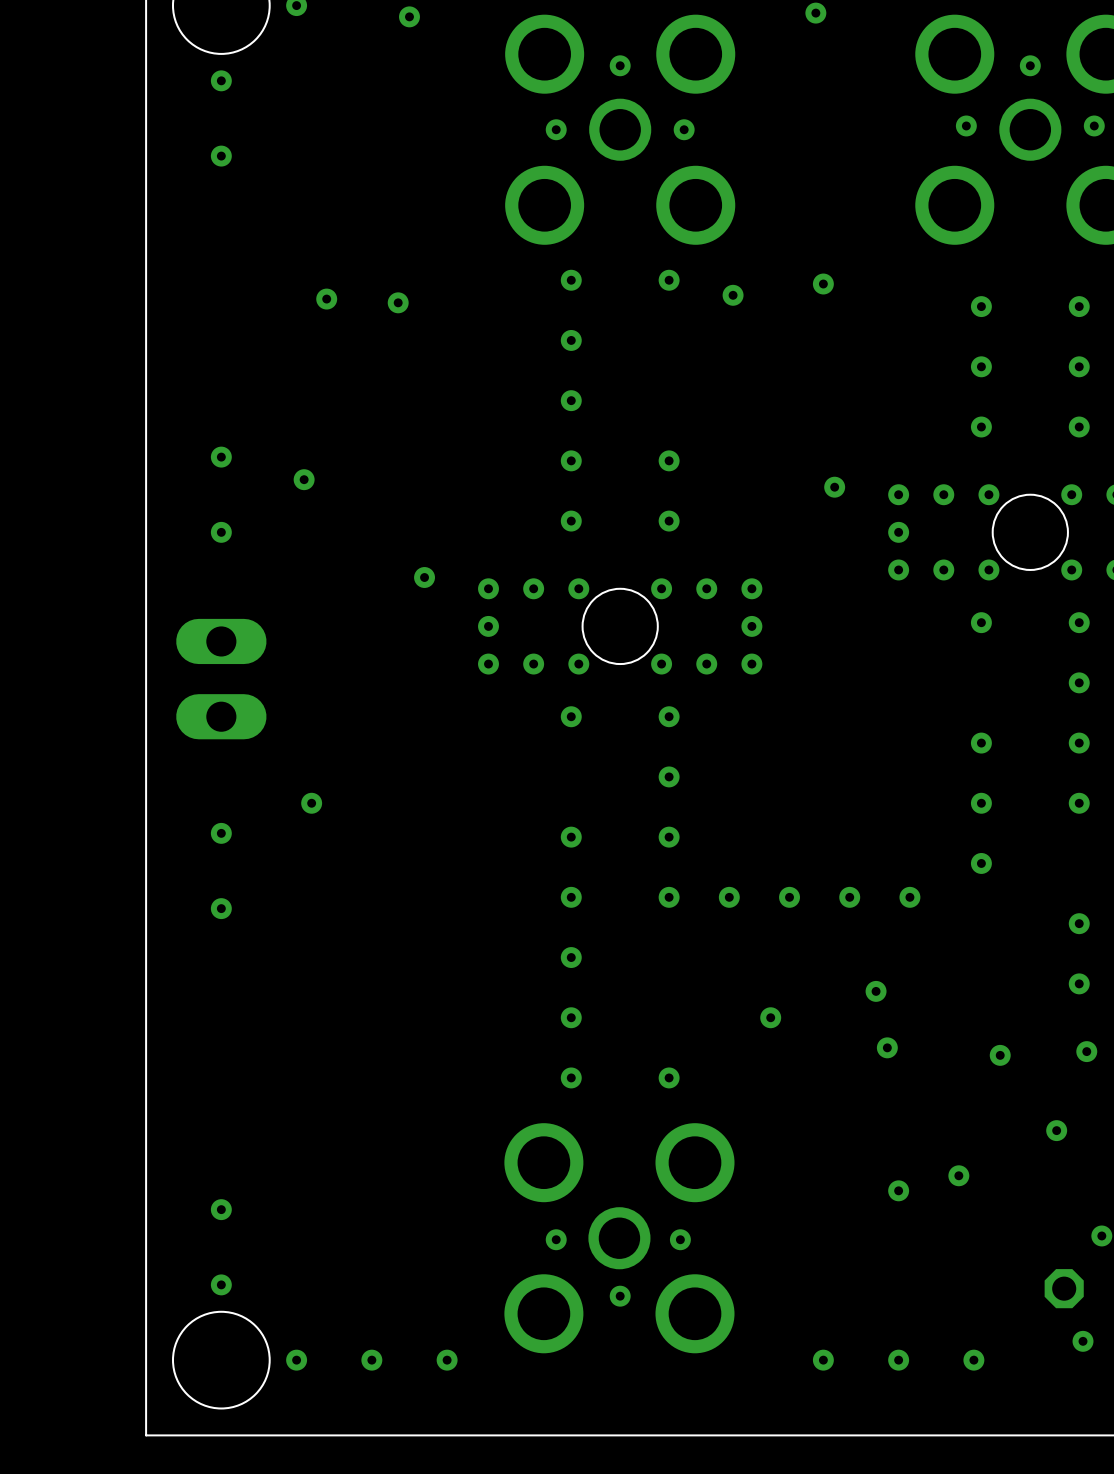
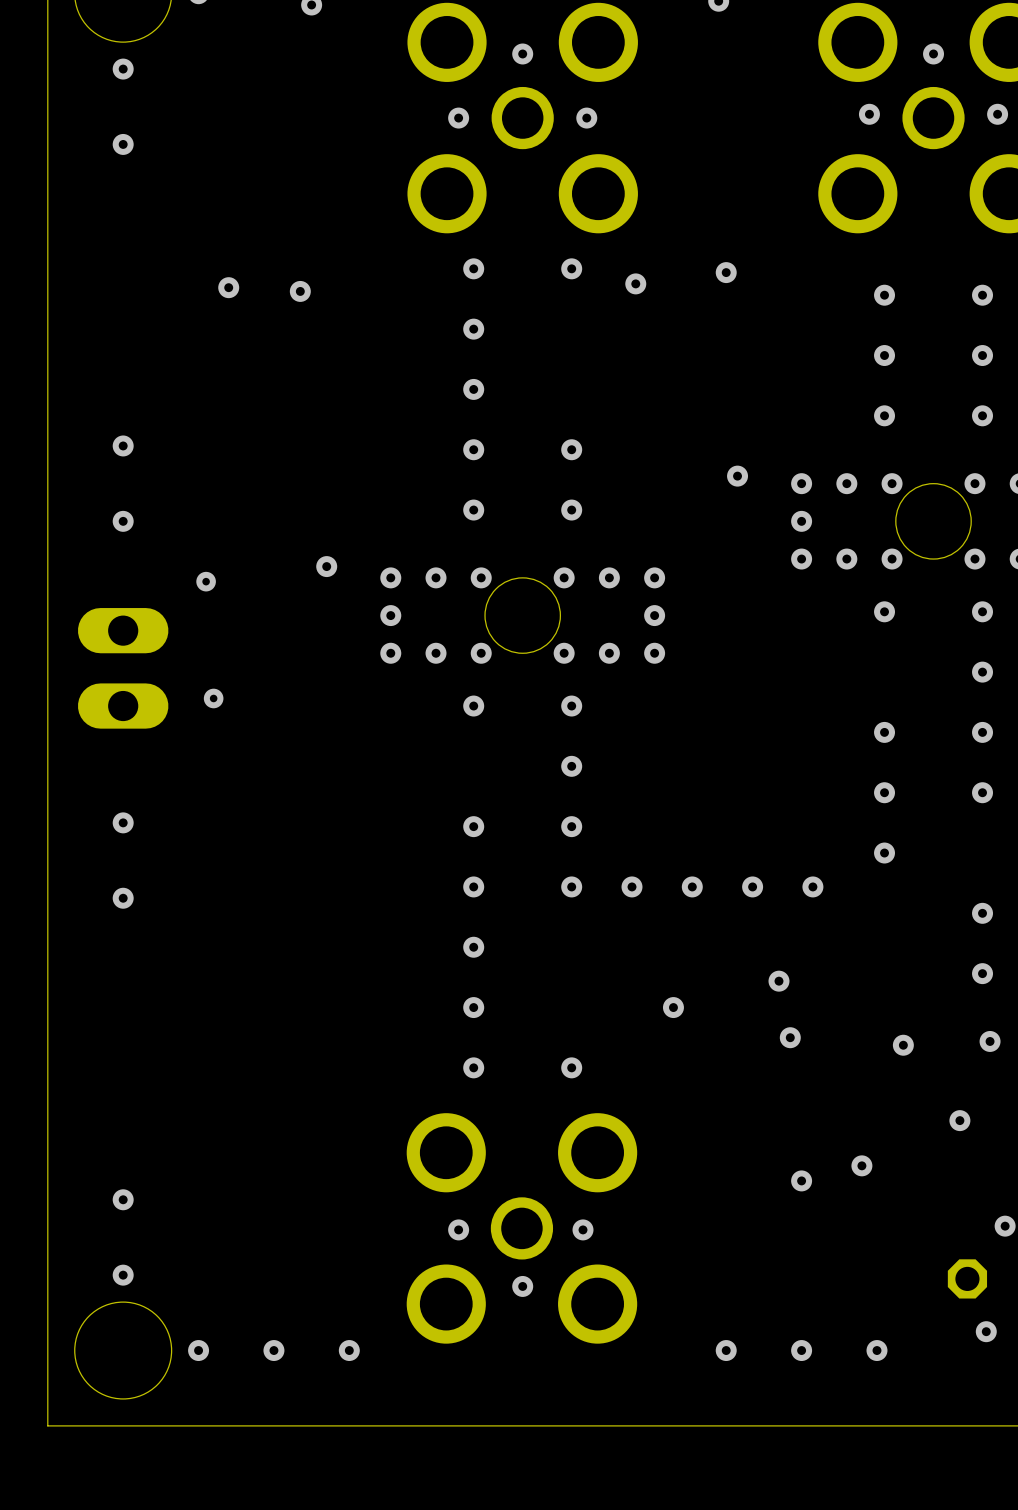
via: (304, 479) -> none
via: none -> (206, 581)
via: none -> (213, 698)
via: (311, 803) -> none

